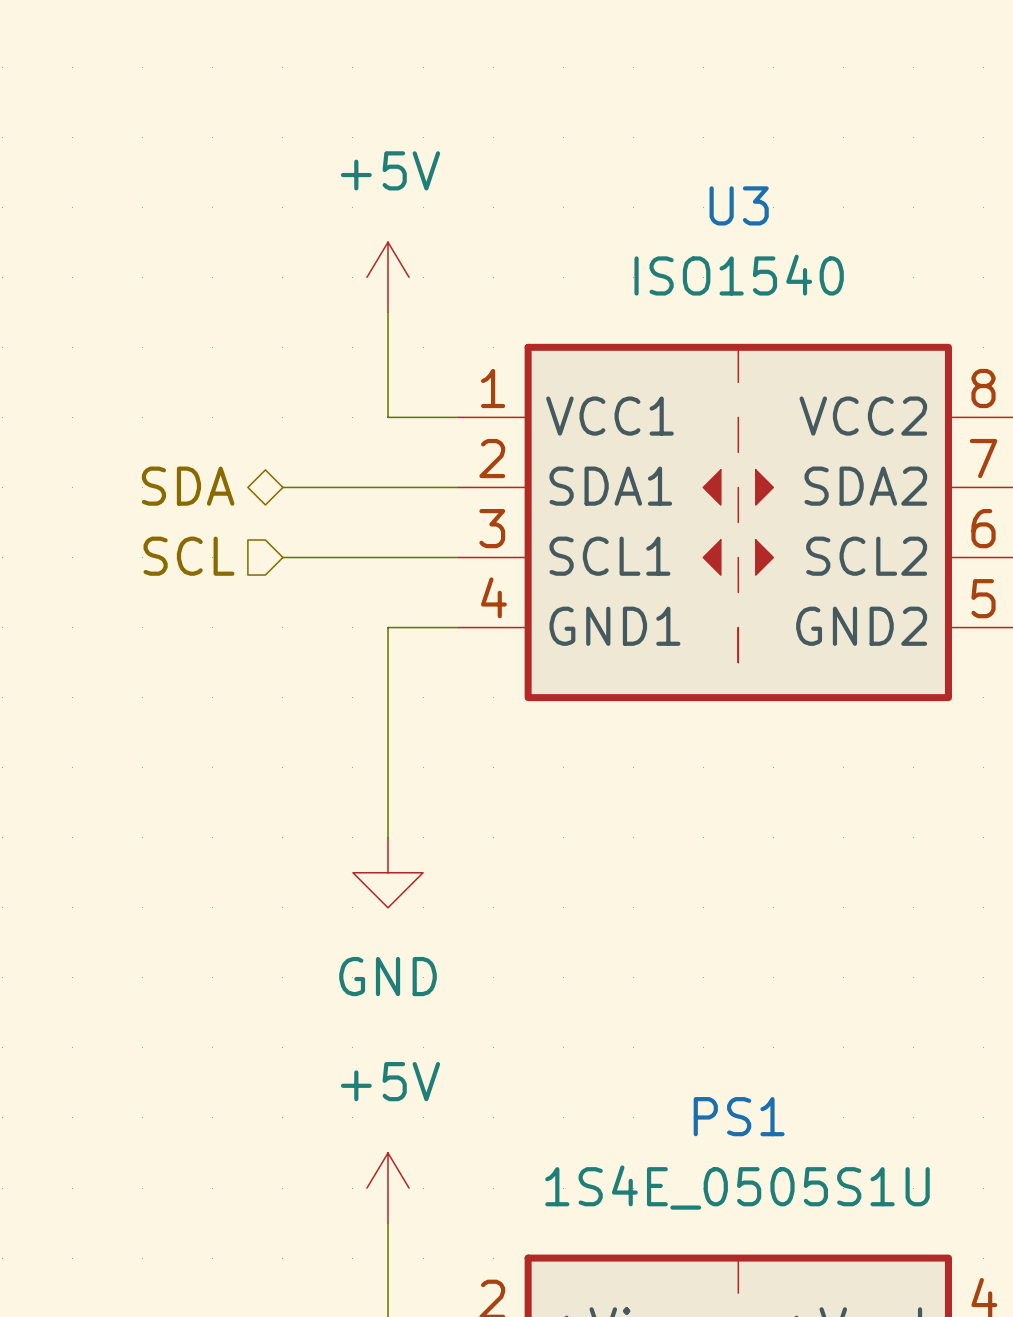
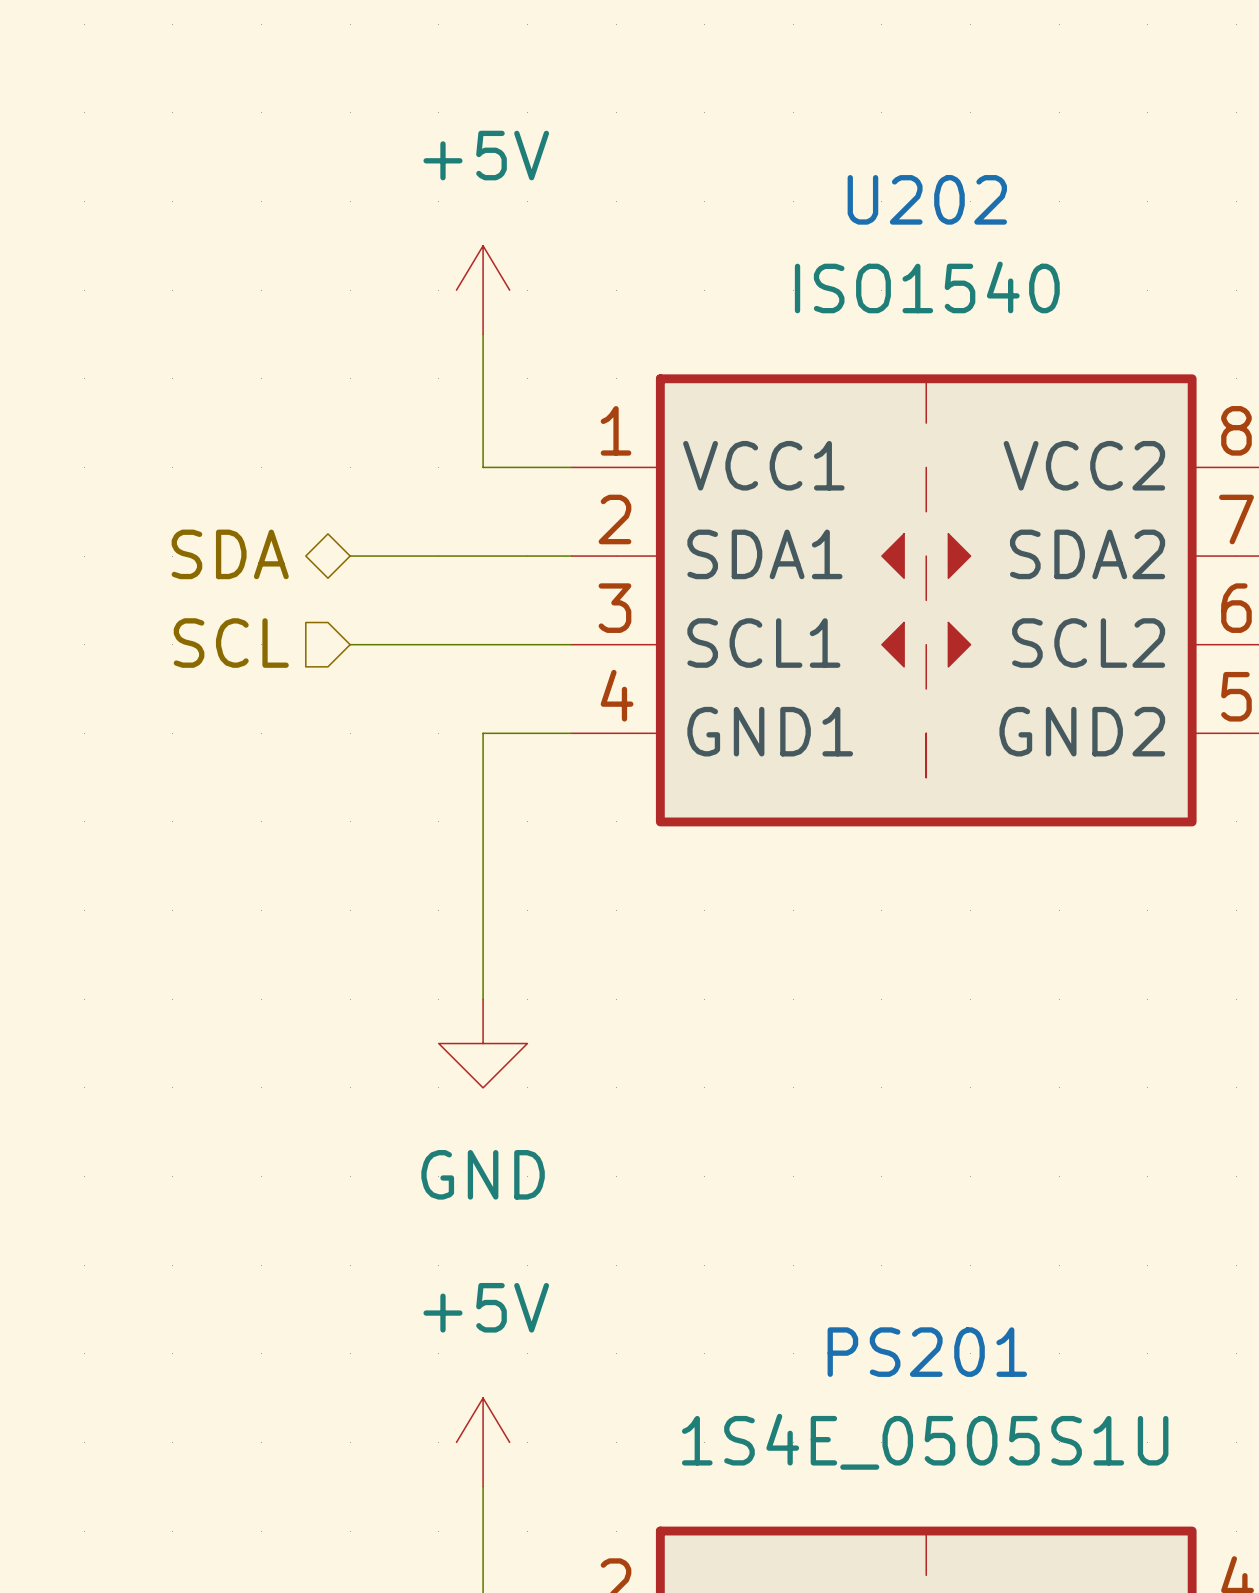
U3 name: U3 (739, 205) -> U202 (927, 199)
PS1 name: PS1 (739, 1116) -> PS201 (927, 1352)

